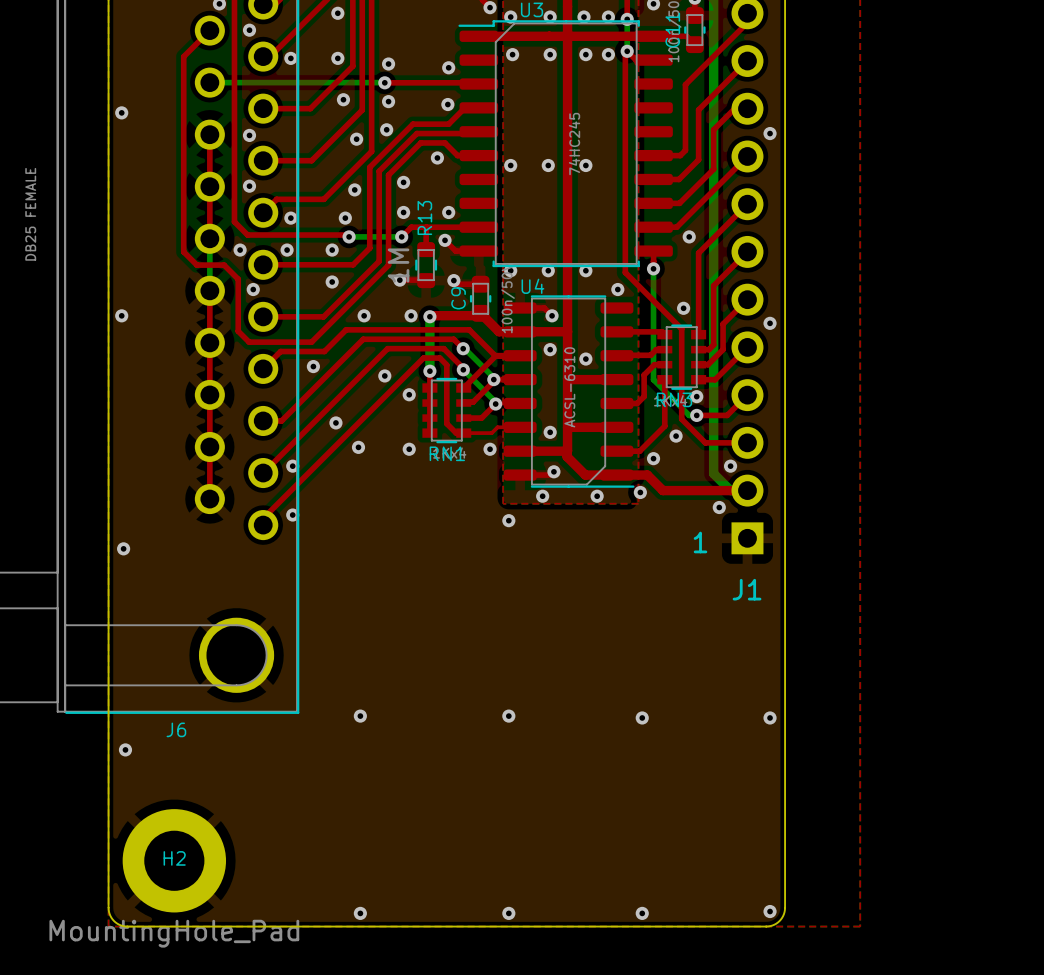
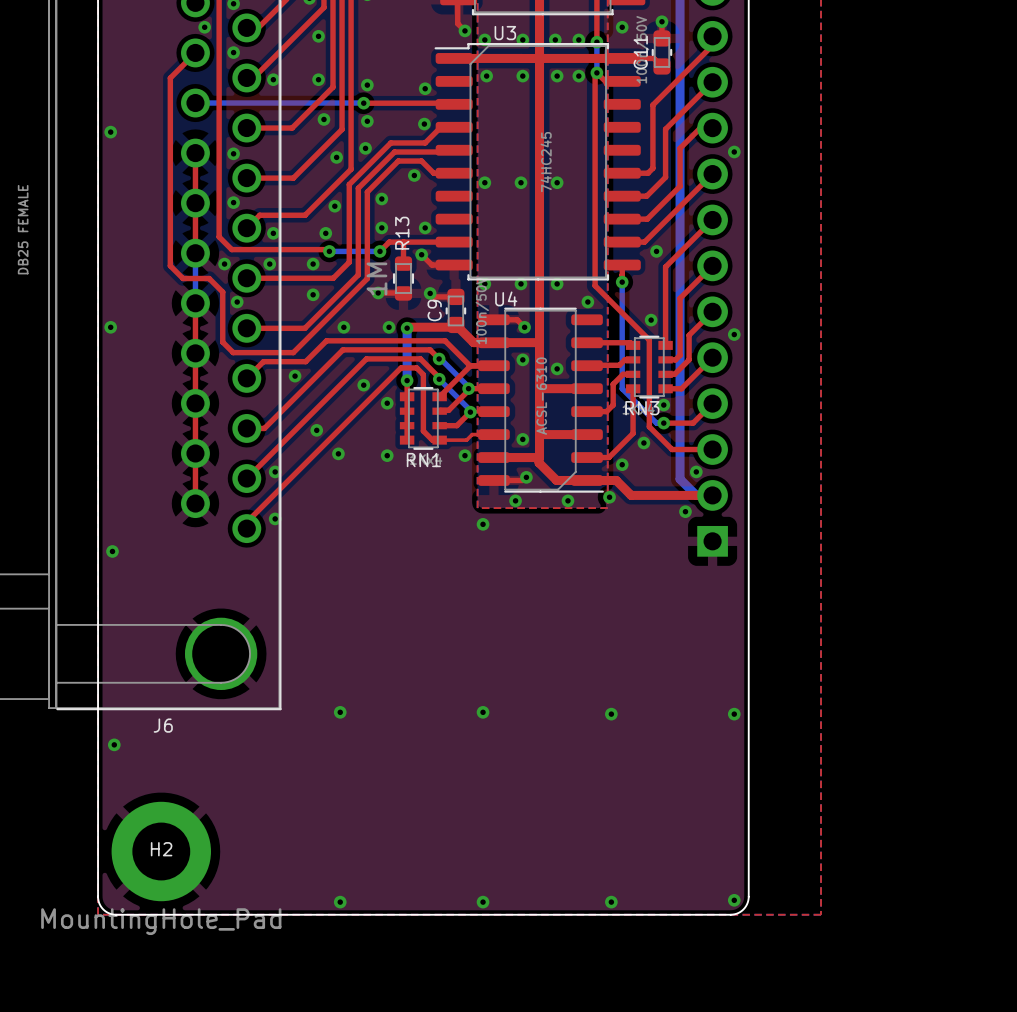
text: 1 (700, 542) -> none
J1 name: J1 (747, 589) -> none

